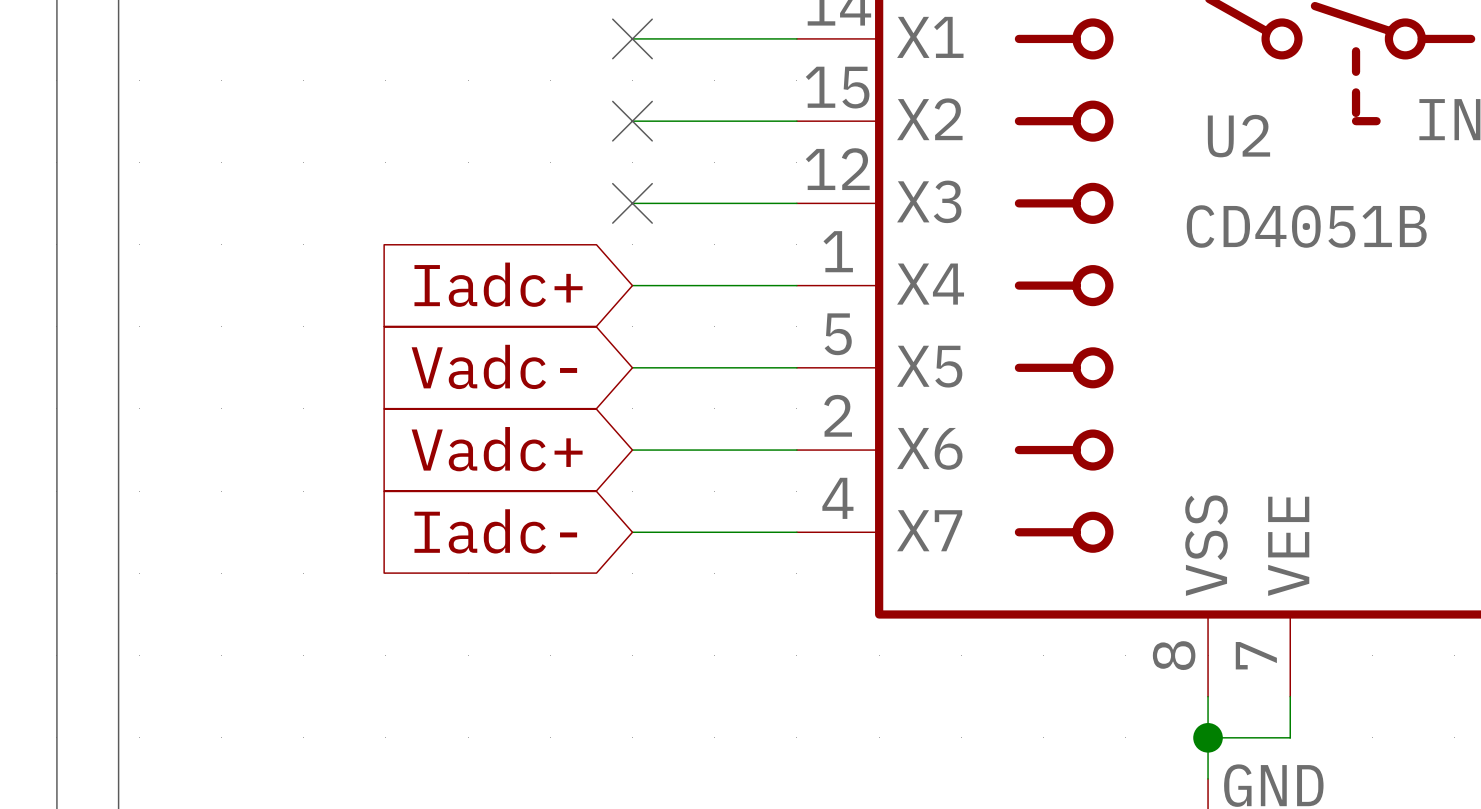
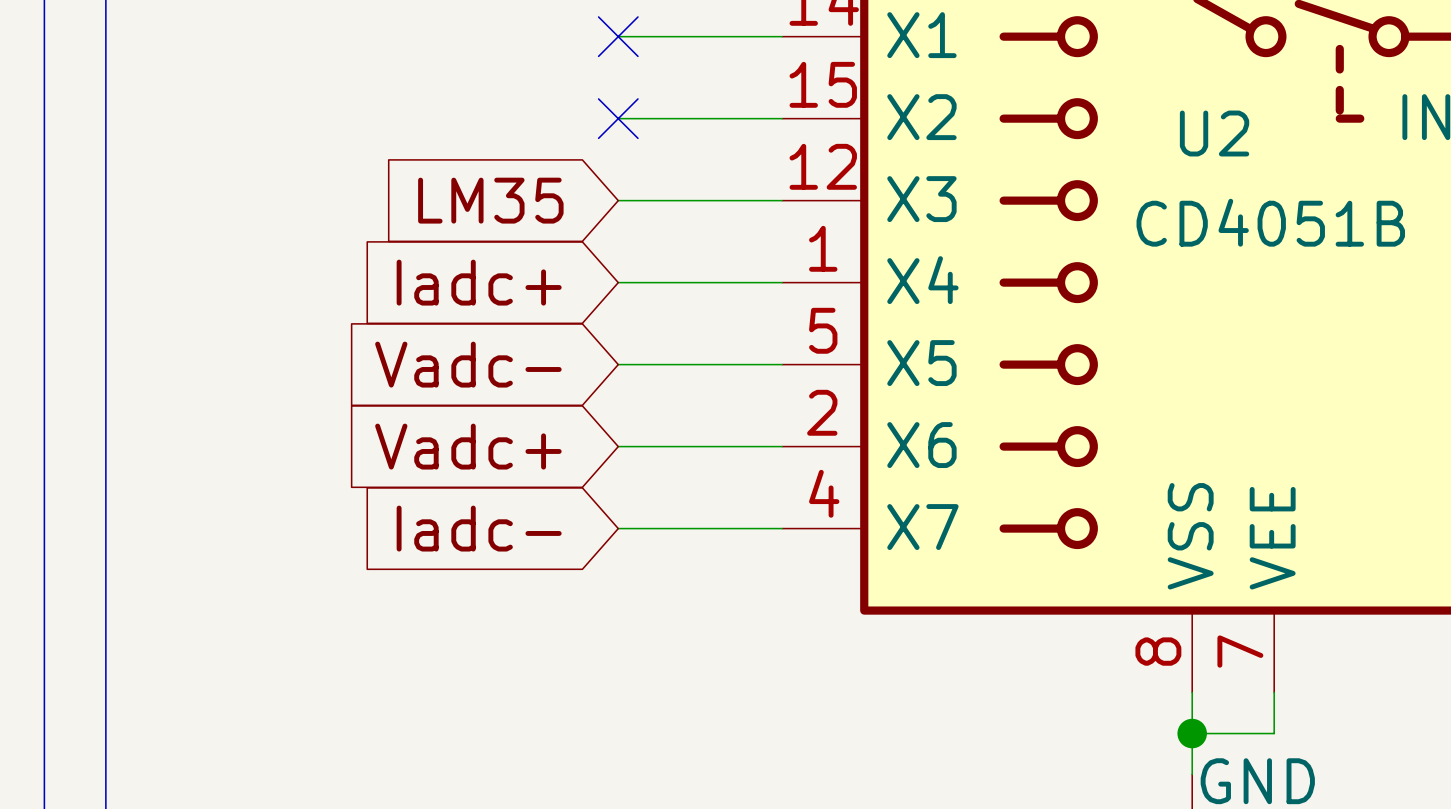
global label: none -> LM35 (490, 200)
no-connect mark: (632, 203) -> none

